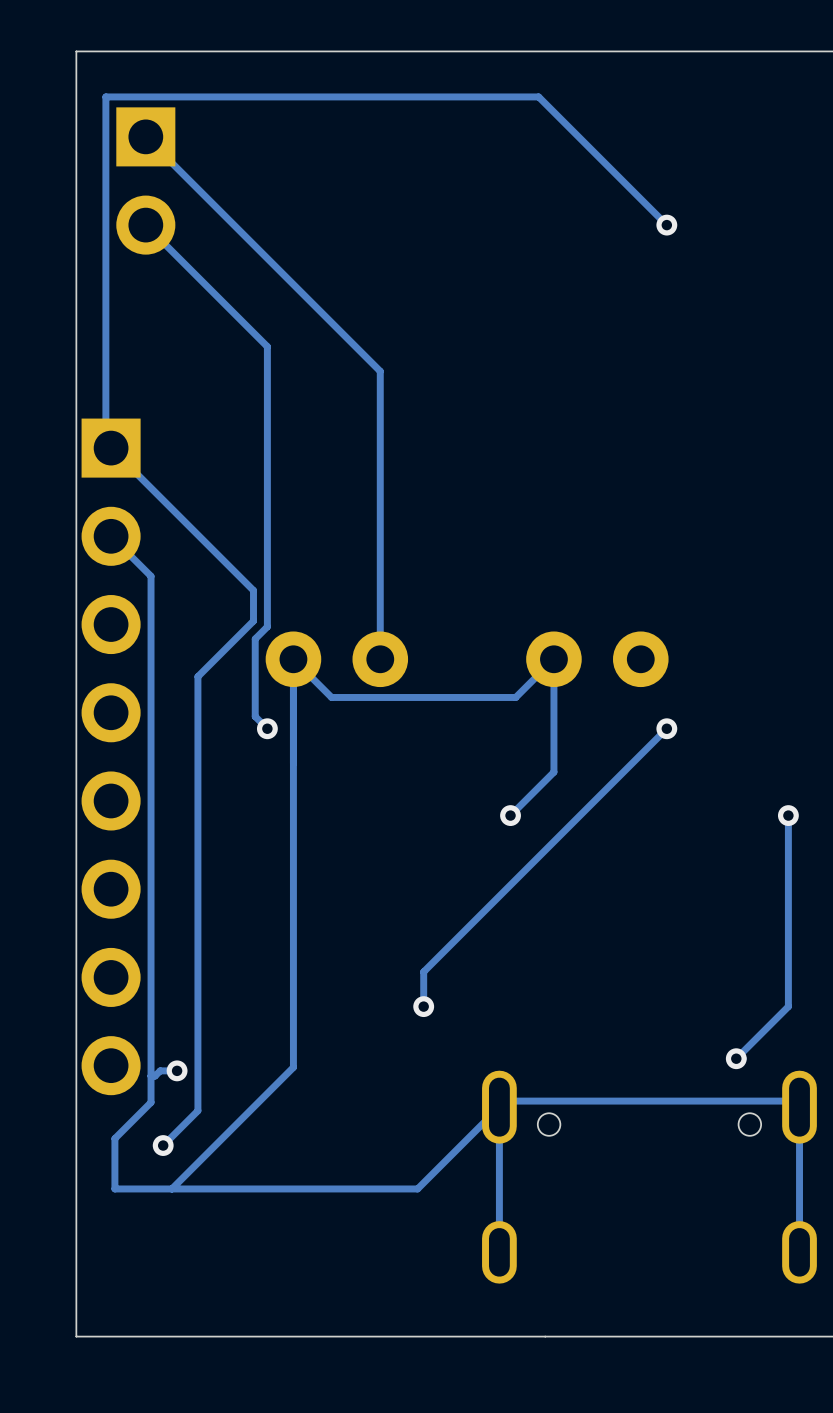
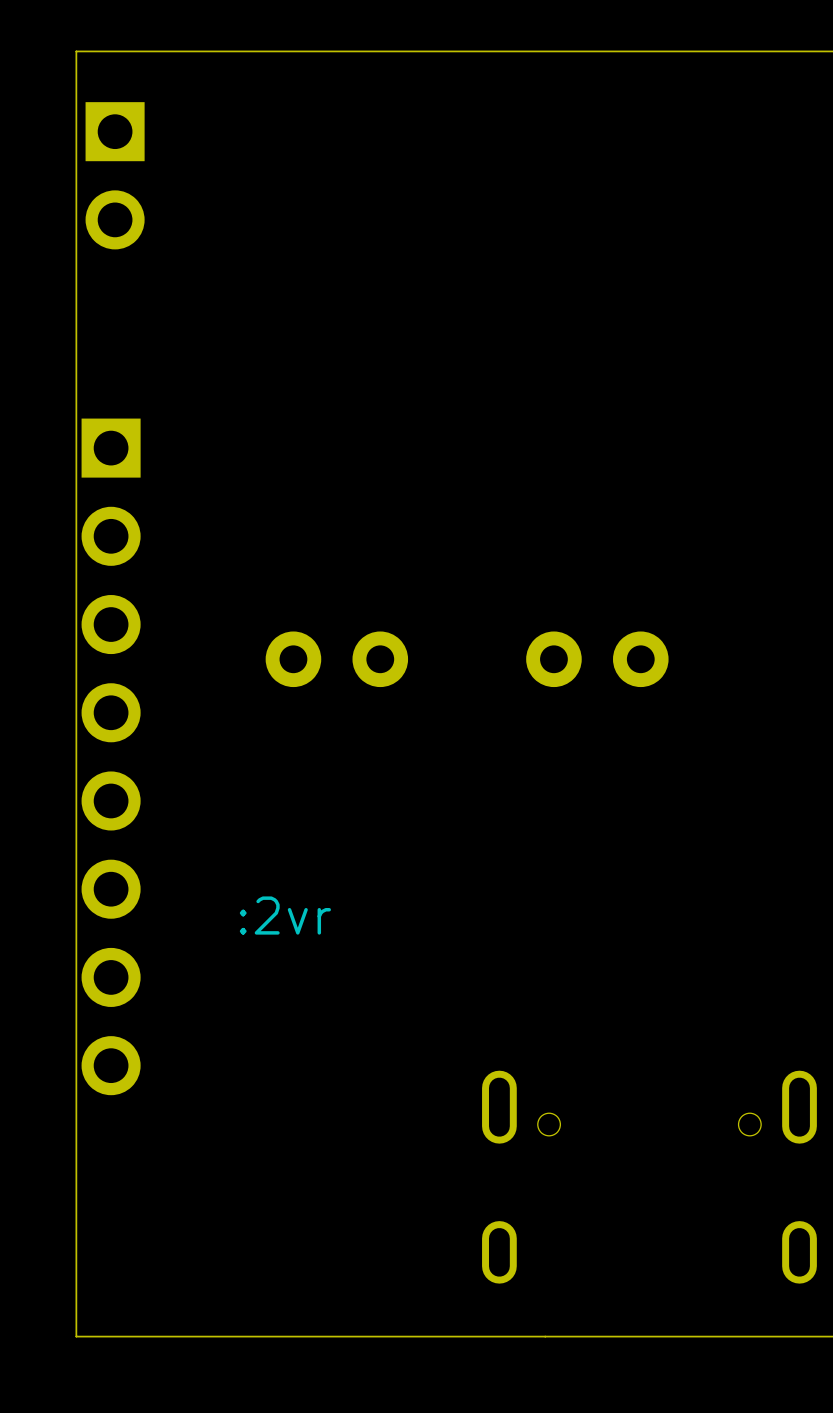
track: (145, 136) (380, 371) (380, 659) -> none
part position: (145, 180) -> (115, 175)
track: (145, 225) (267, 346) (267, 626) (255, 638) (255, 716) (267, 728) -> none
track: (666, 225) (538, 96) (105, 96) (105, 442) (253, 590) (253, 621) (197, 676) (197, 1110) (163, 1145) -> none
via: (666, 225) -> none
track: (111, 536) (151, 576) (151, 1102) (114, 1138) (114, 1188) (417, 1188) (505, 1101) (793, 1101) (799, 1107) (799, 1252) -> none
via: (267, 728) -> none
track: (666, 728) (423, 971) (423, 1006) -> none
via: (666, 728) -> none
track: (510, 815) (553, 772) (553, 659) (515, 697) (331, 697) (293, 659) (293, 1067) (171, 1188) -> none
via: (510, 815) -> none
track: (788, 815) (788, 1006) (736, 1058) (743, 1058) -> none
via: (788, 815) -> none
text: none -> :2vr (285, 915)
via: (423, 1006) -> none
via: (736, 1058) -> none
track: (177, 1070) (160, 1070) (155, 1076) (151, 1076) -> none
via: (177, 1070) -> none
track: (499, 1107) (499, 1252) -> none
via: (163, 1145) -> none

